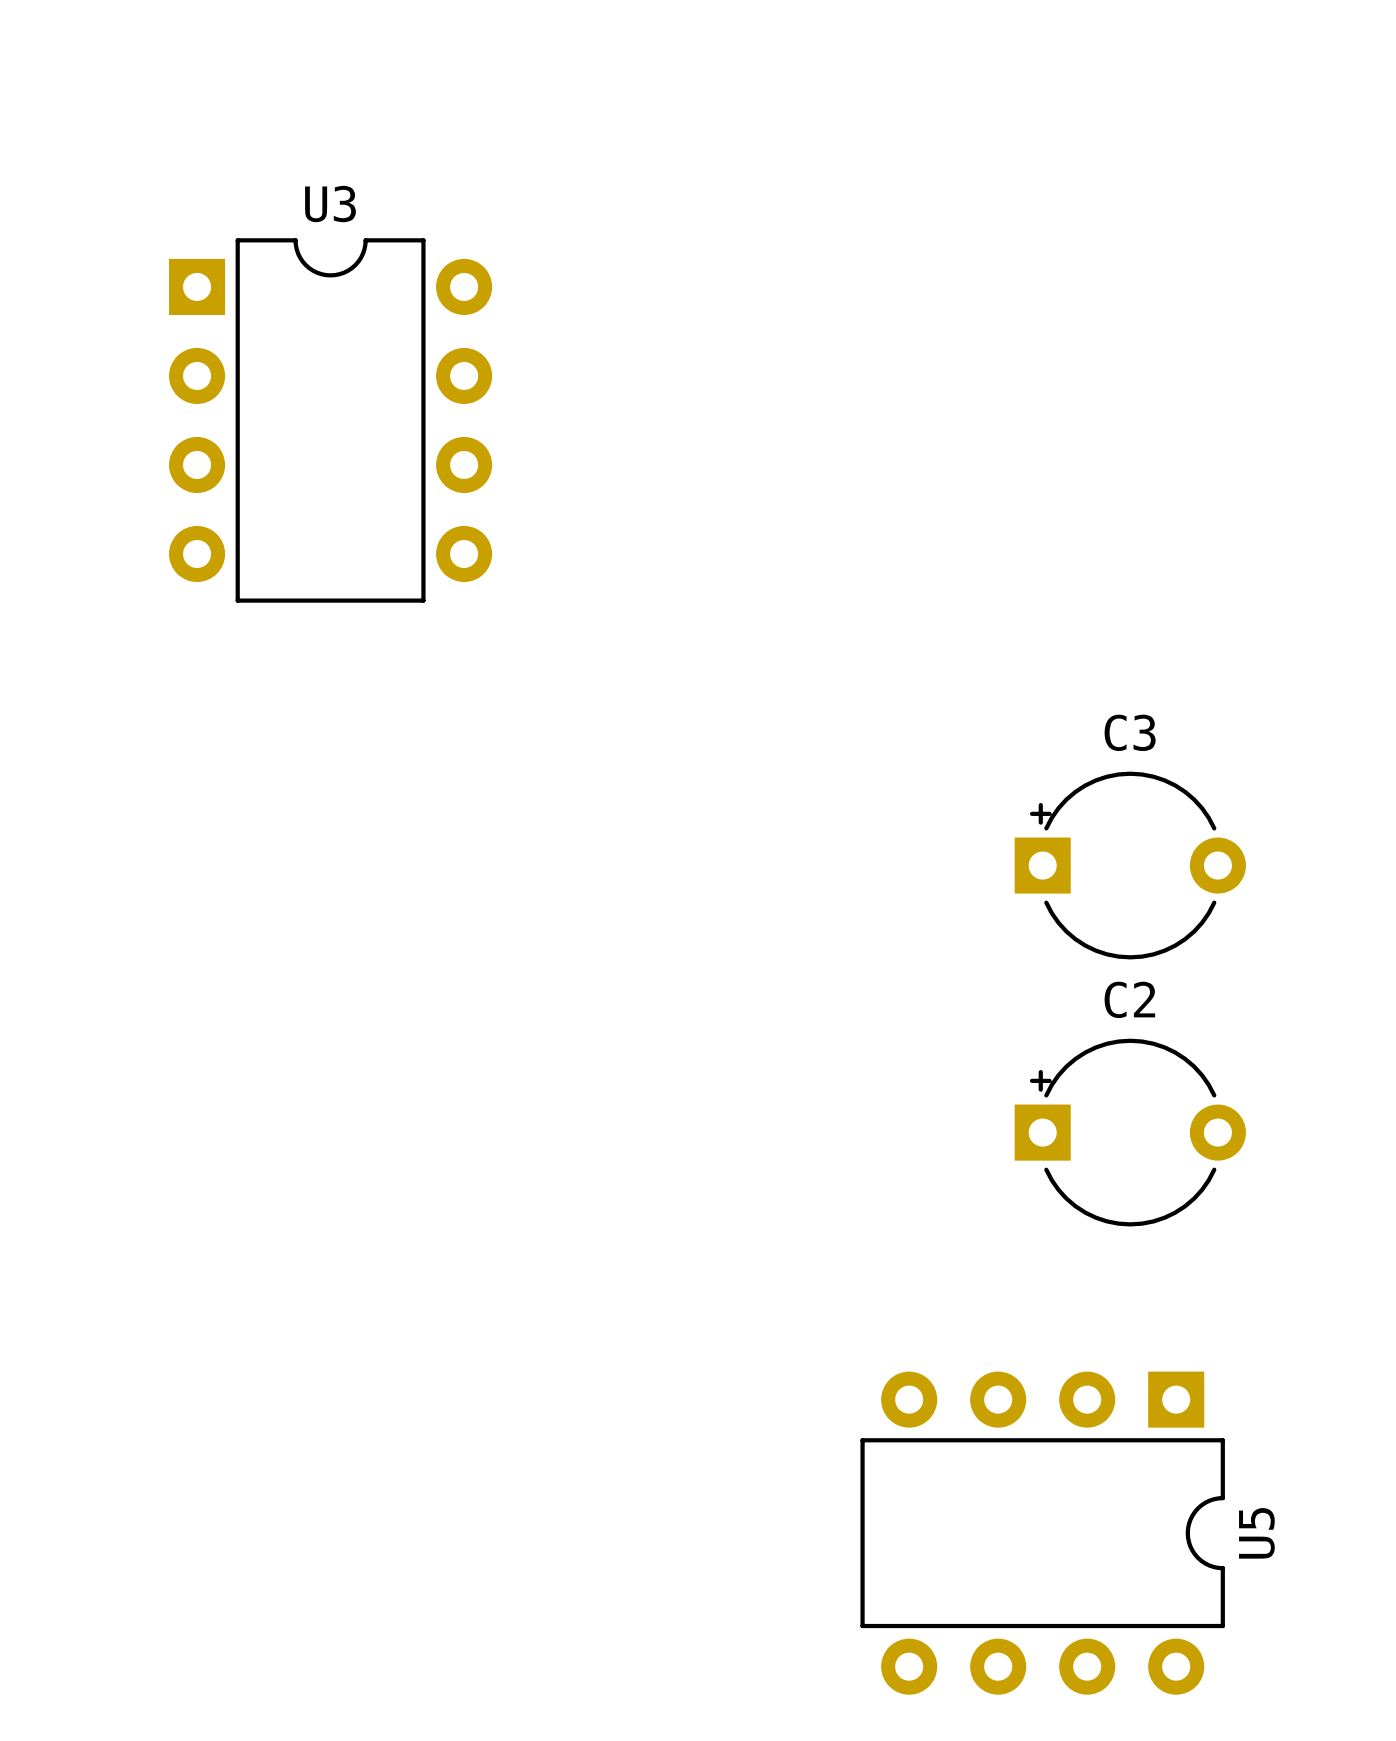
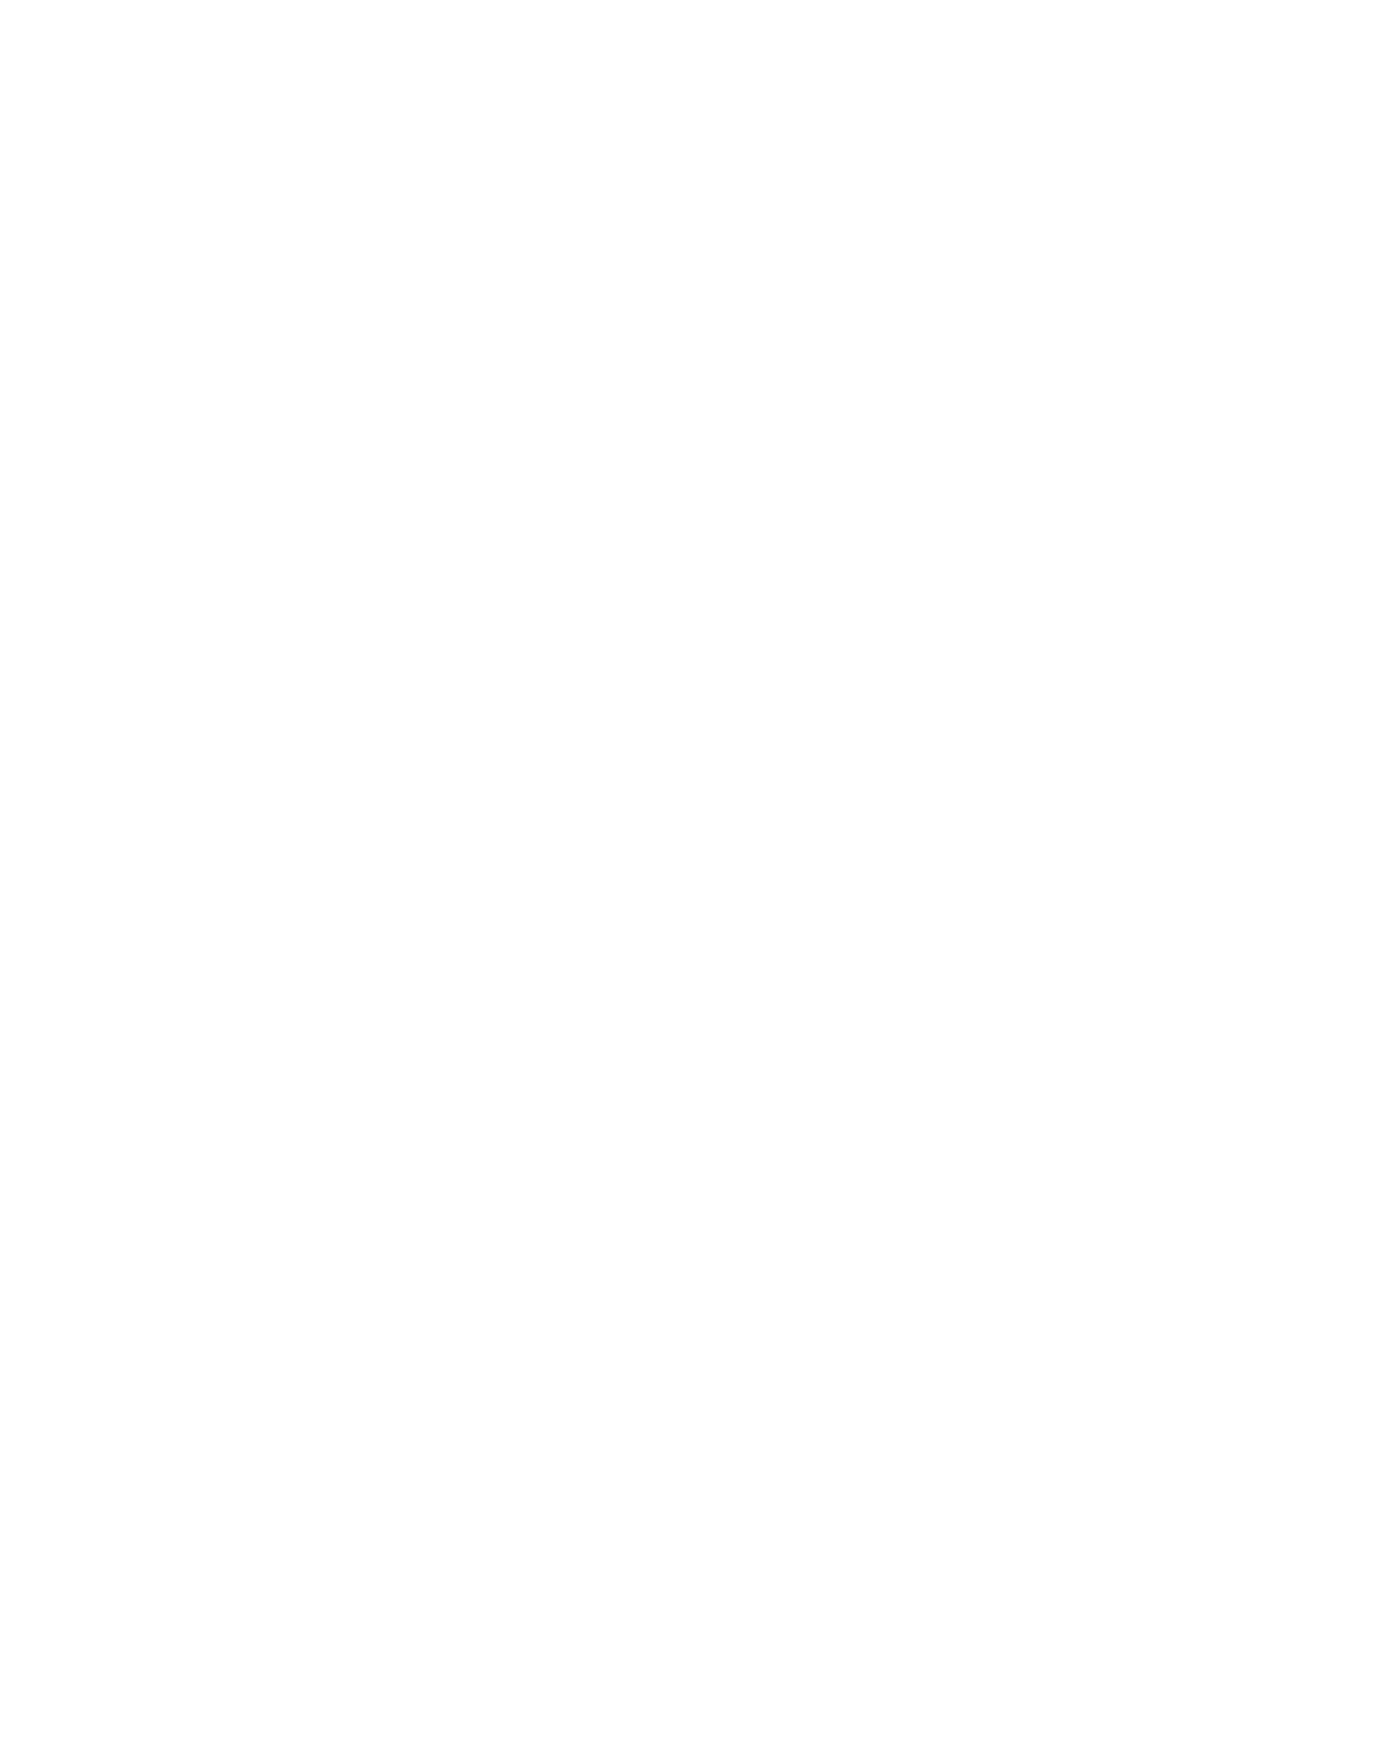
U3: (330, 420) -> none
C3: (1130, 865) -> none
C2: (1130, 1132) -> none
U5: (1042, 1533) -> none

